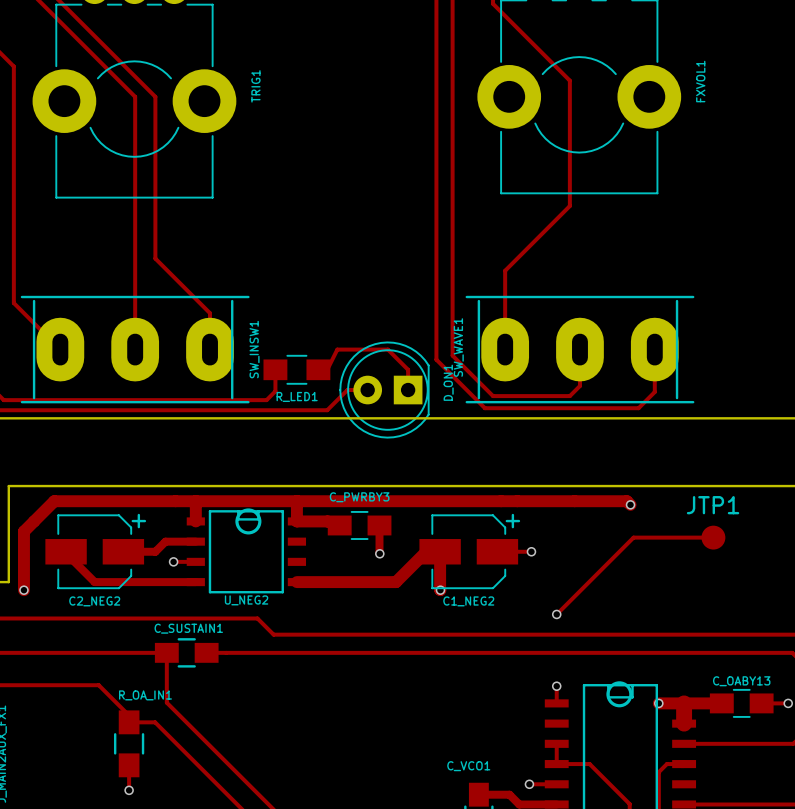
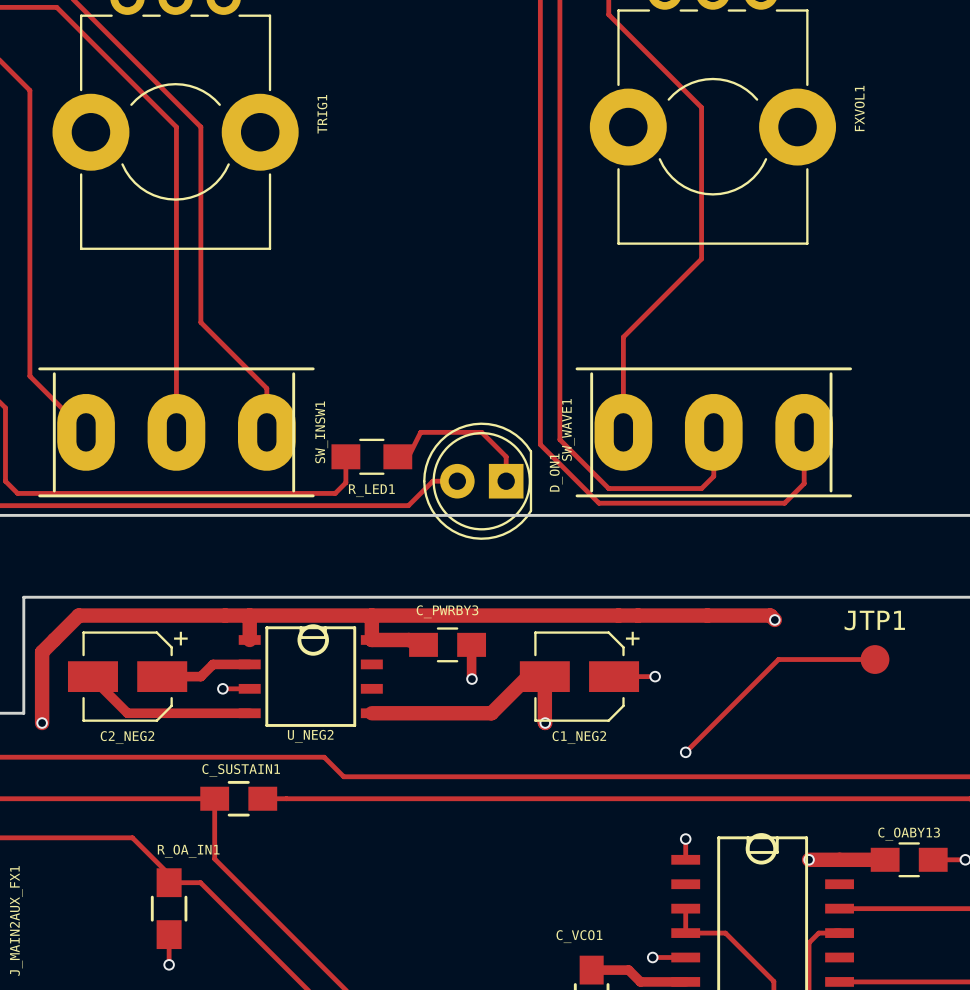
track: (684, 703) (684, 723) -> none

